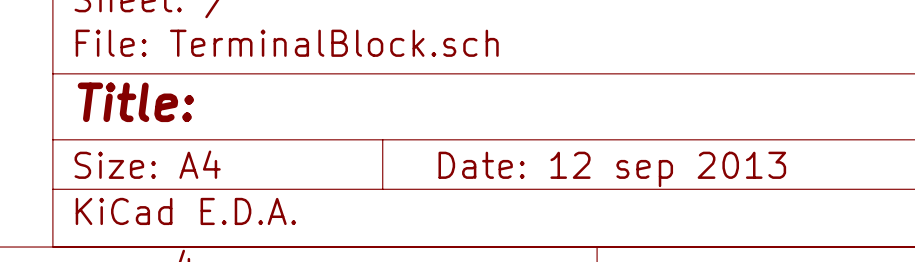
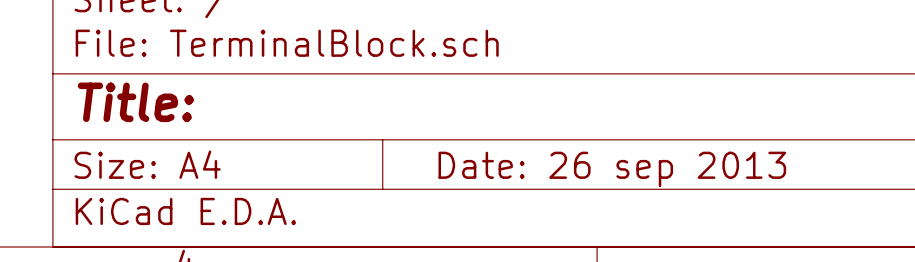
title block: Date: 12 sep 2013 (612, 169) -> Date: 26 sep 2013 (612, 169)

